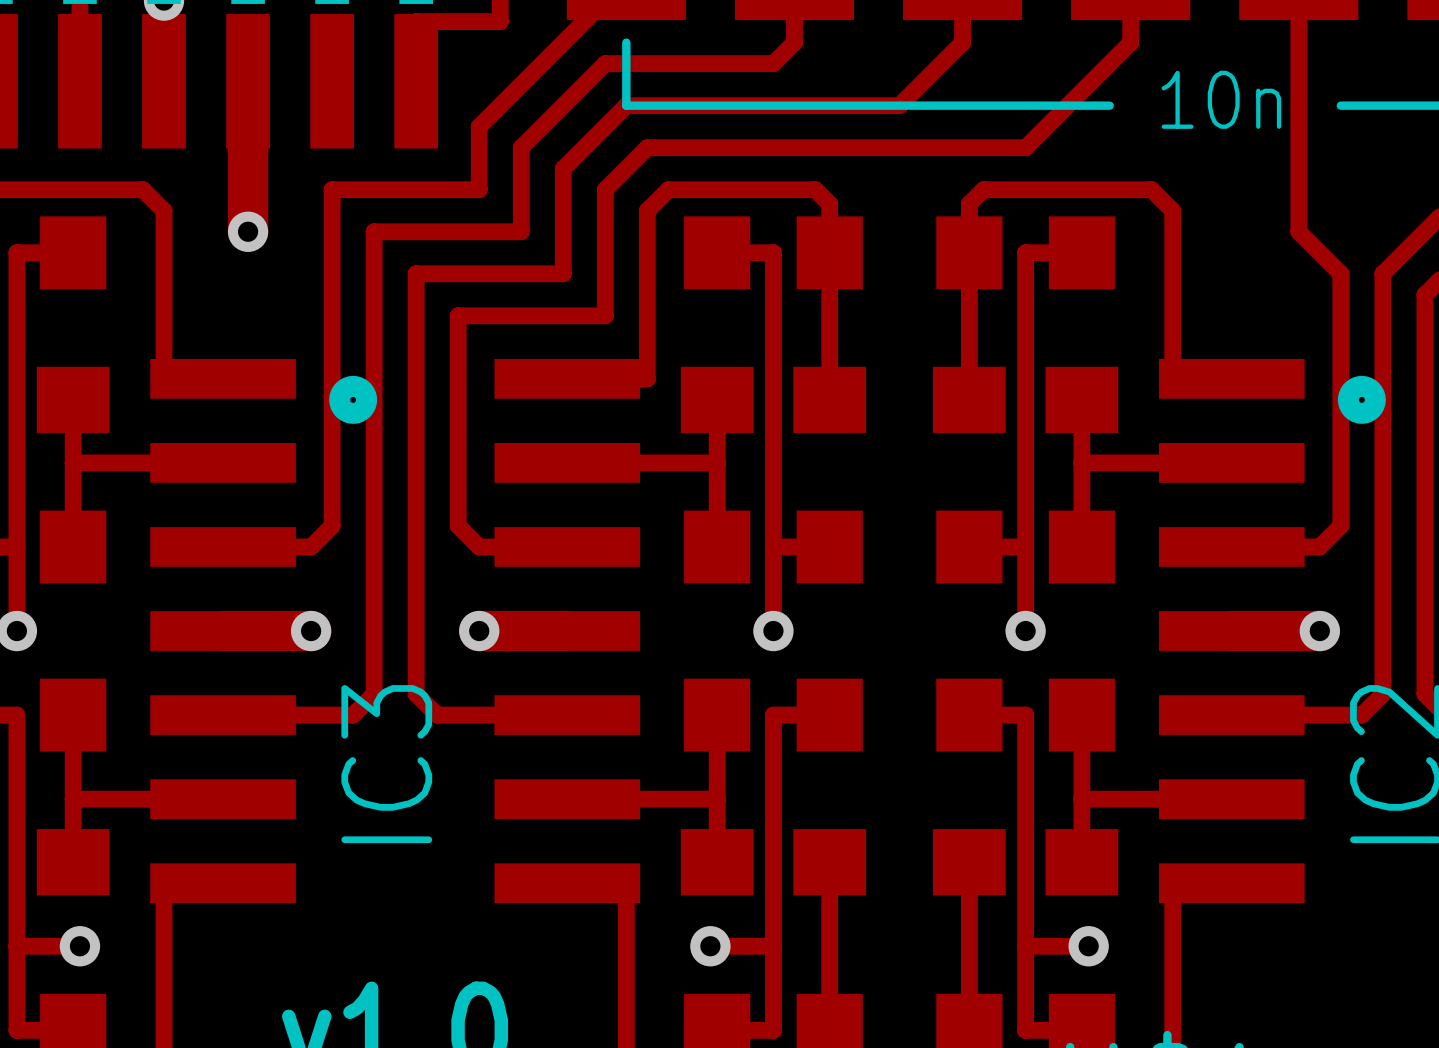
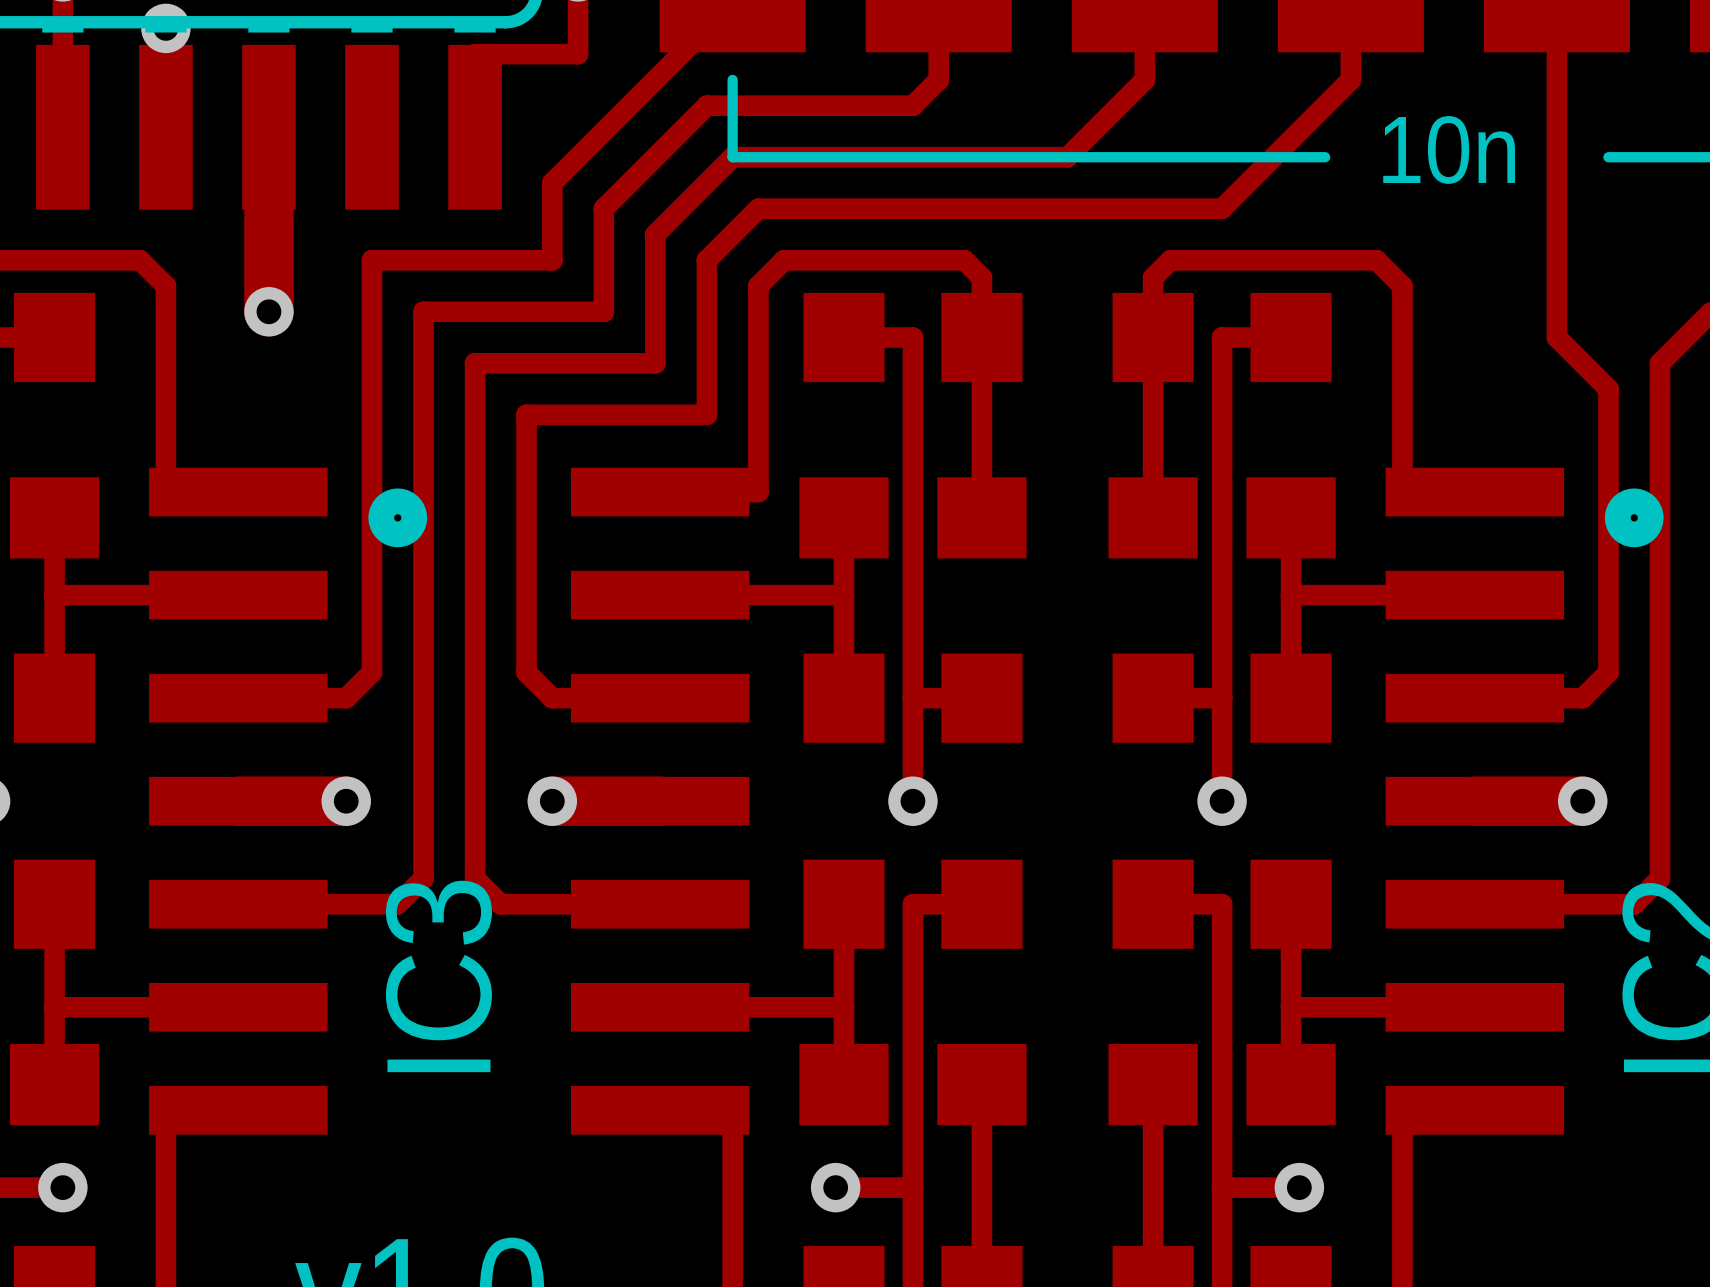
track: (1298, 231) (1340, 273) (1340, 294) -> (1556, 311) (1556, 337) (1608, 389)

